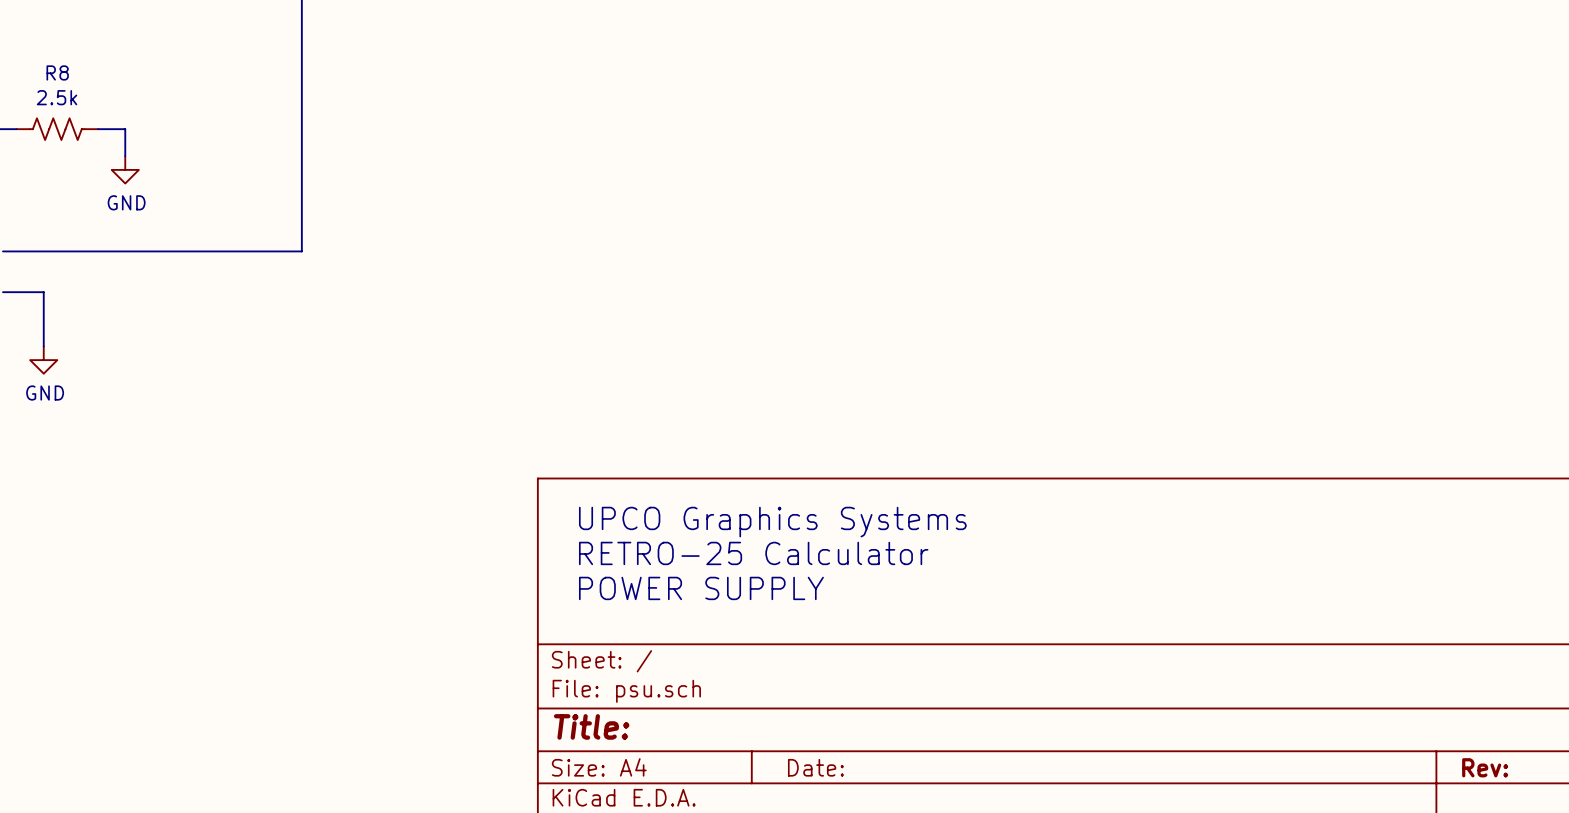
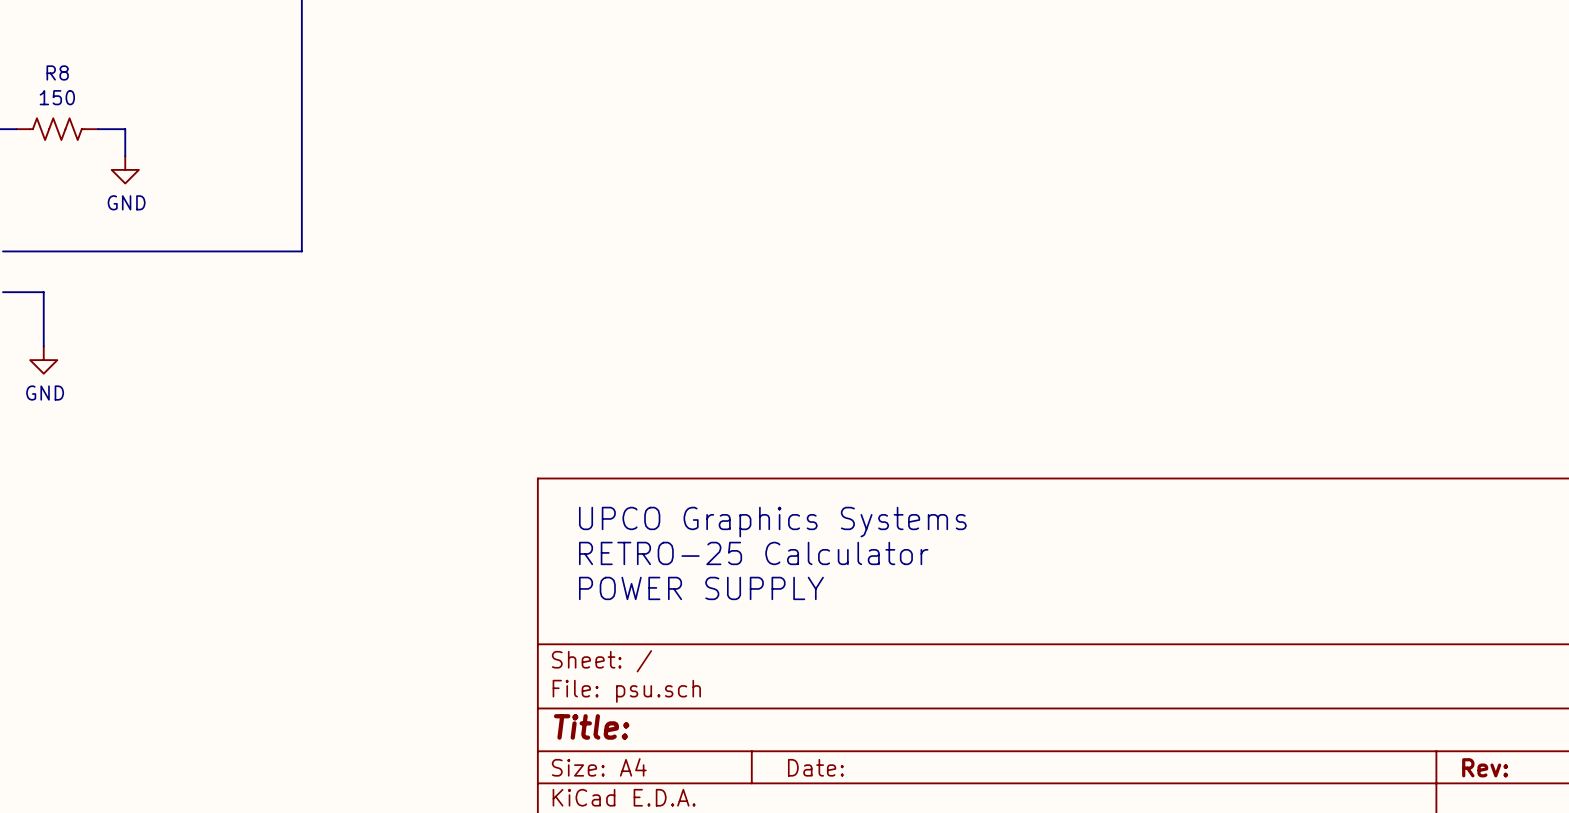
R8 value: 2.5k (57, 97) -> 150 (57, 97)

